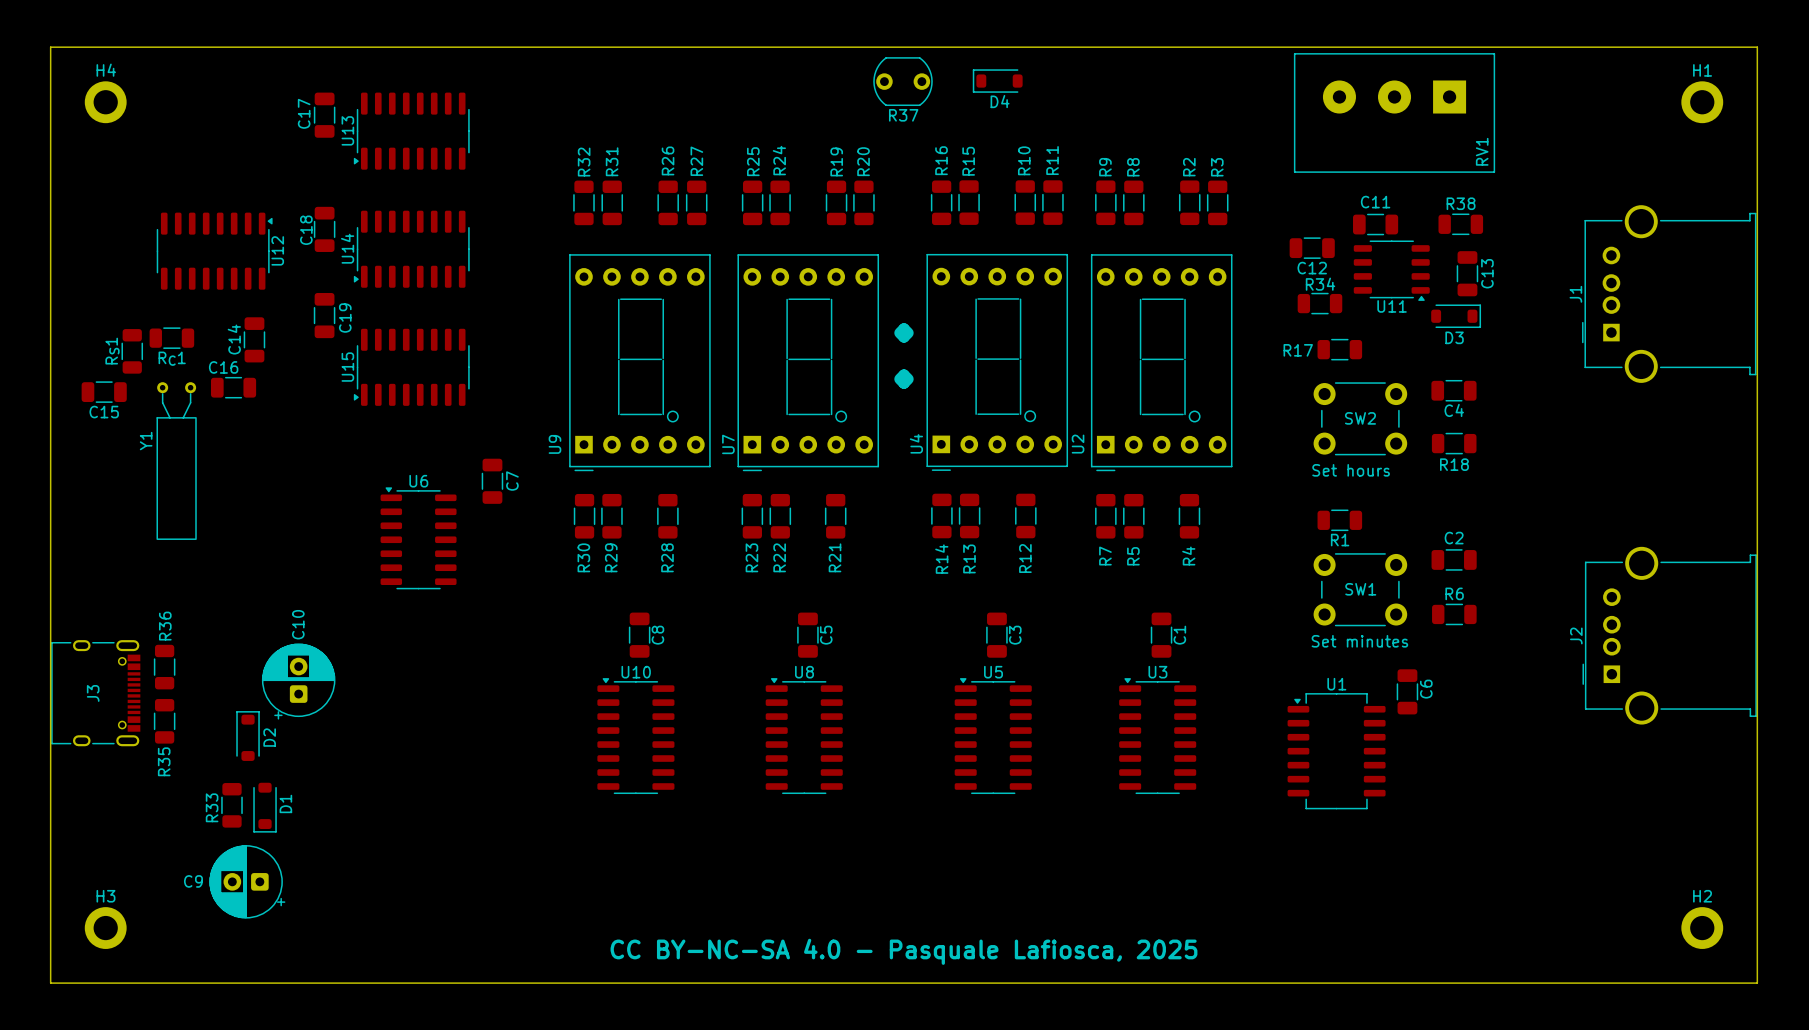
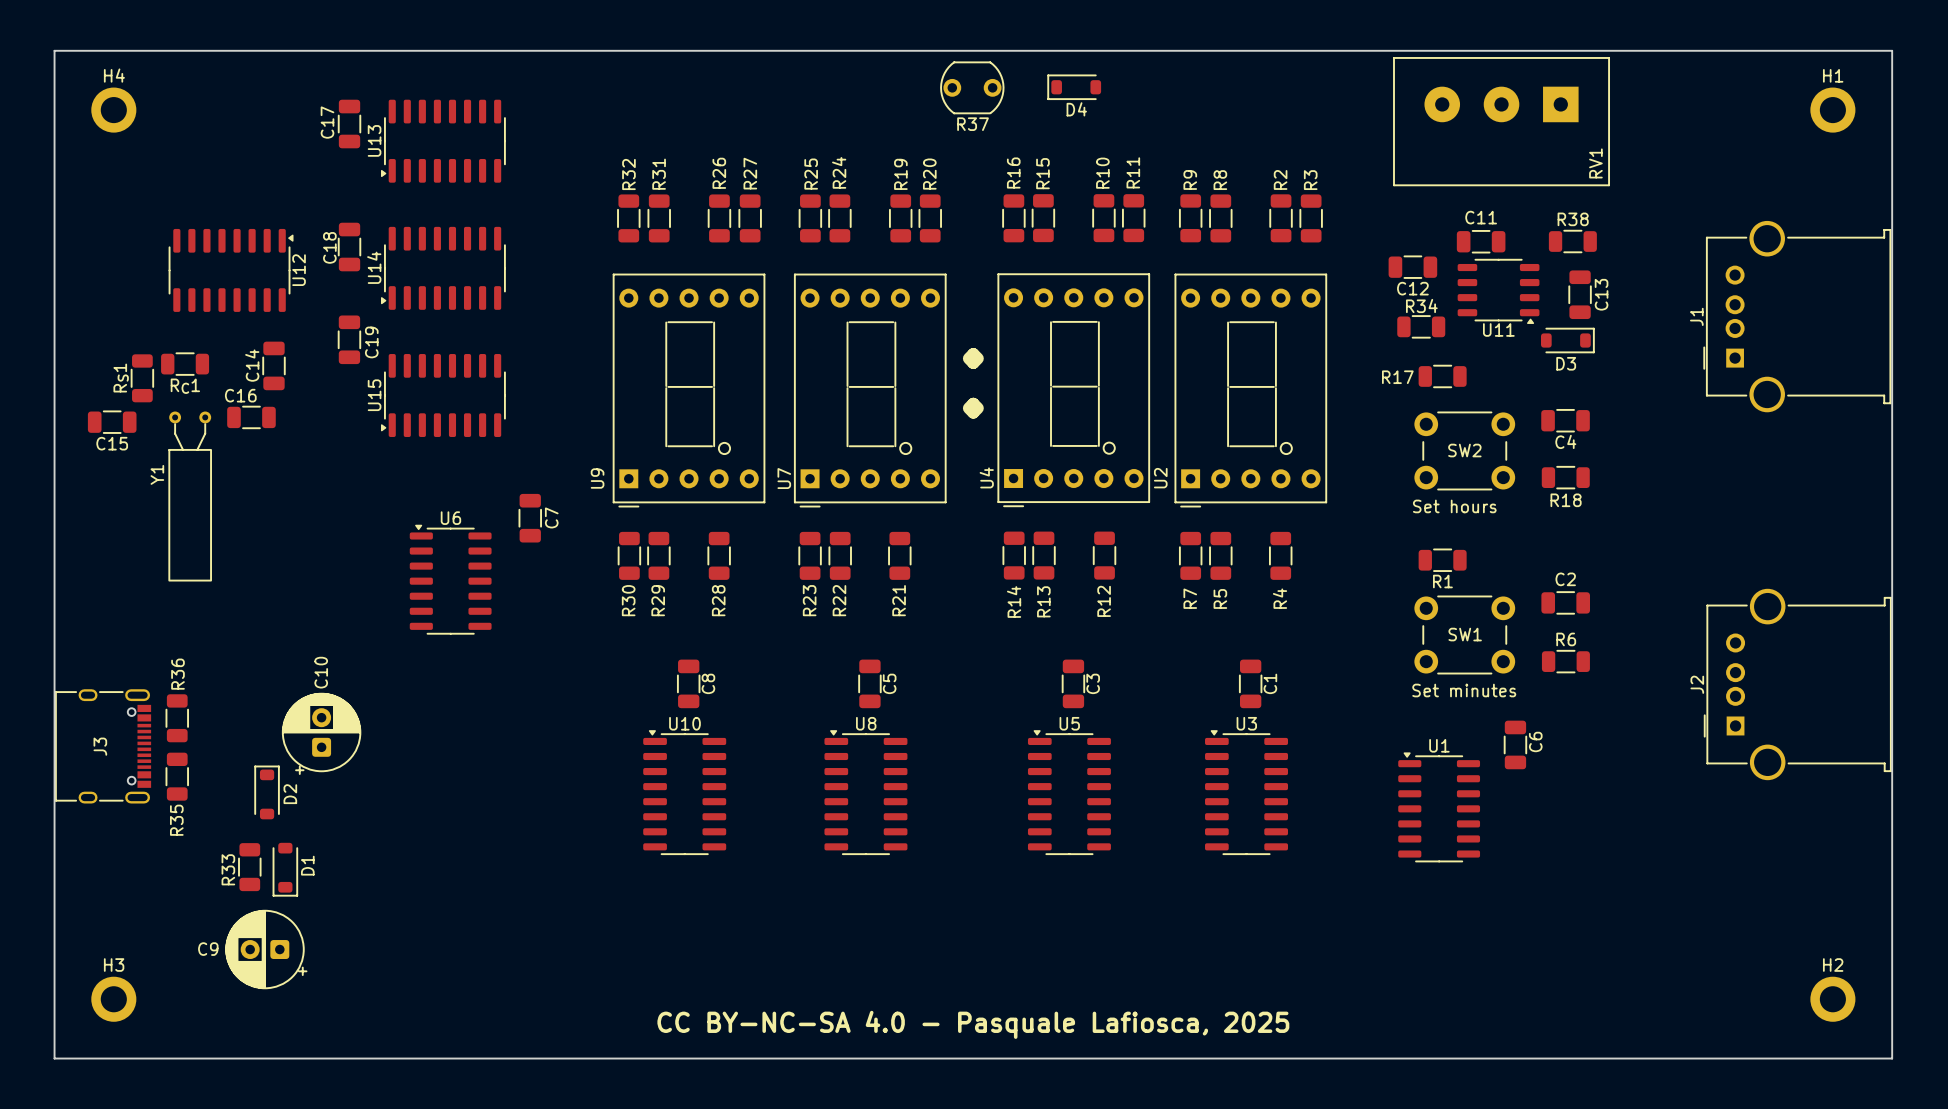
U1 footprint: [1287, 693, 1386, 810] -> [1398, 752, 1481, 863]

